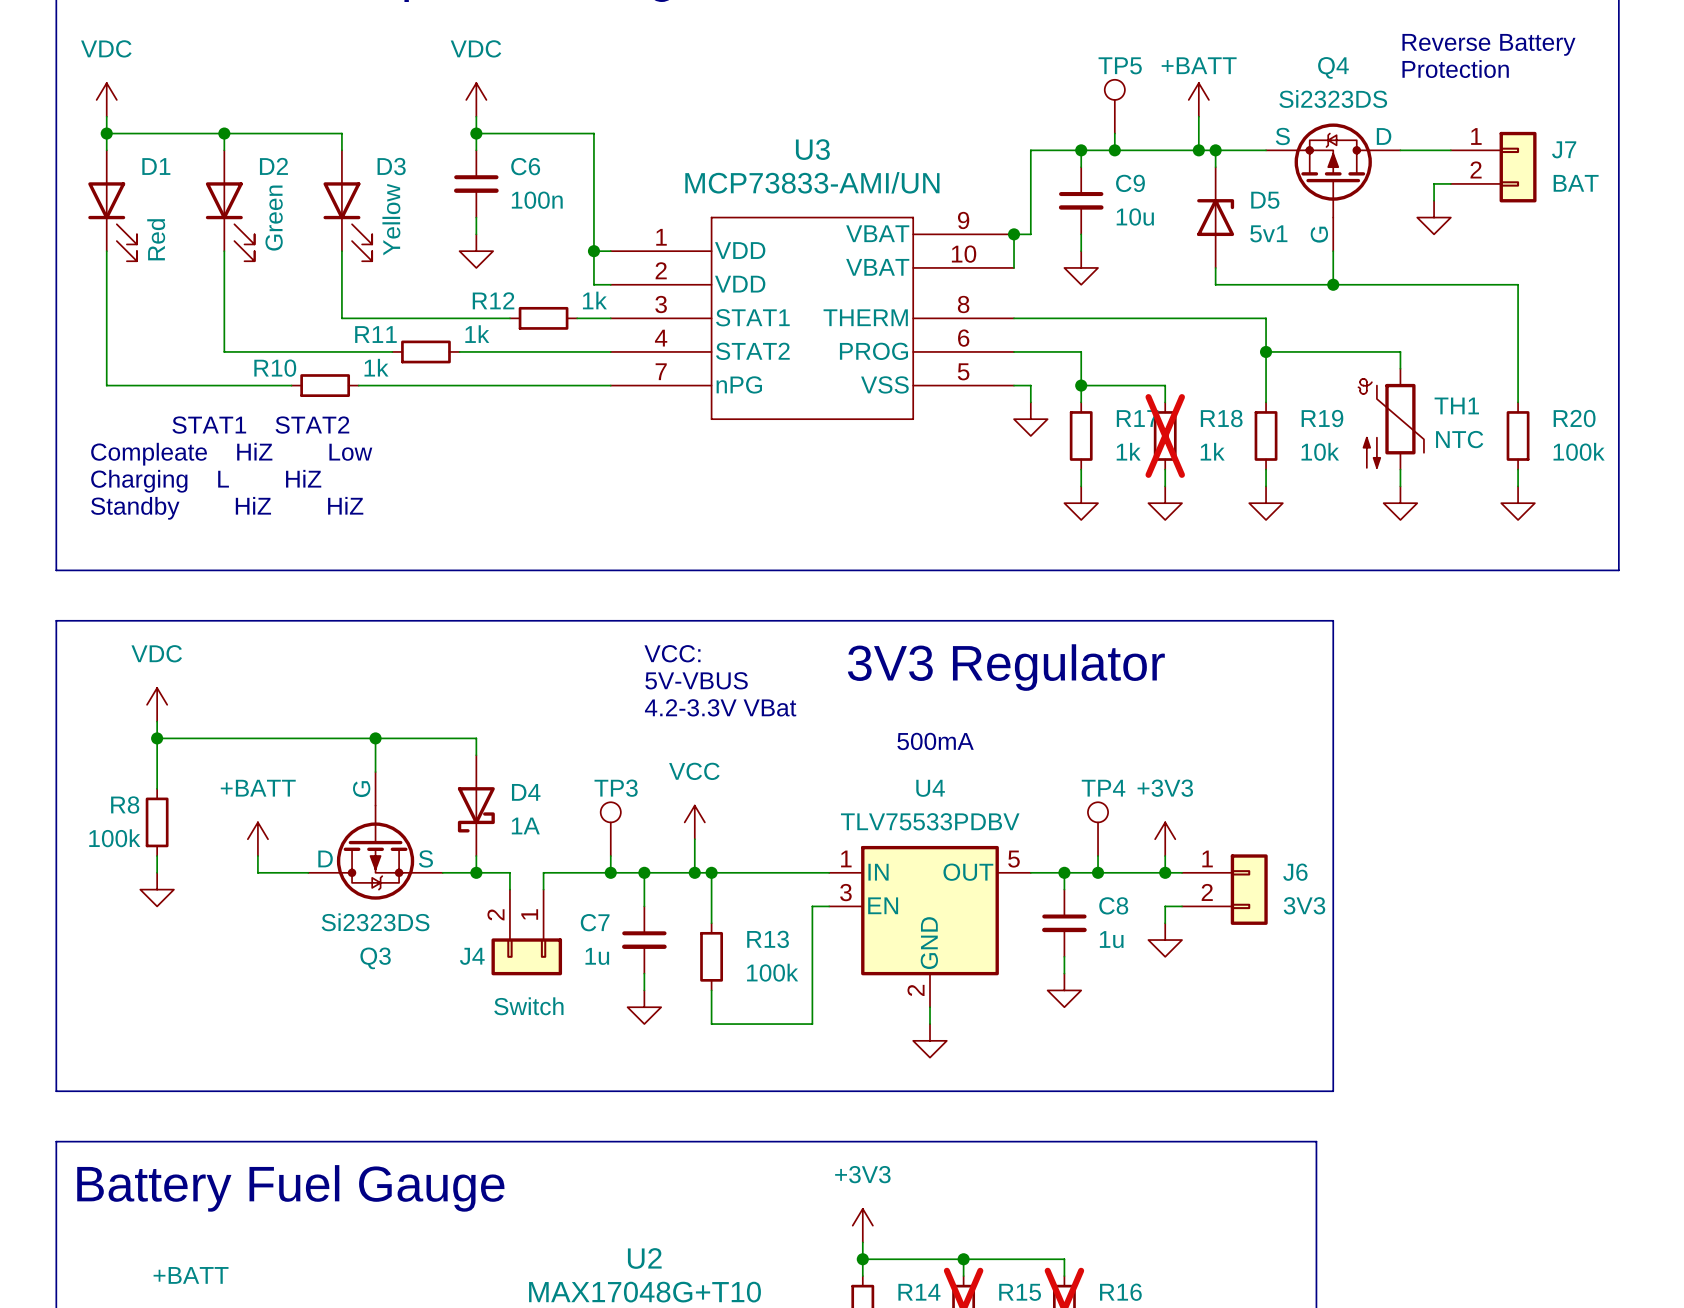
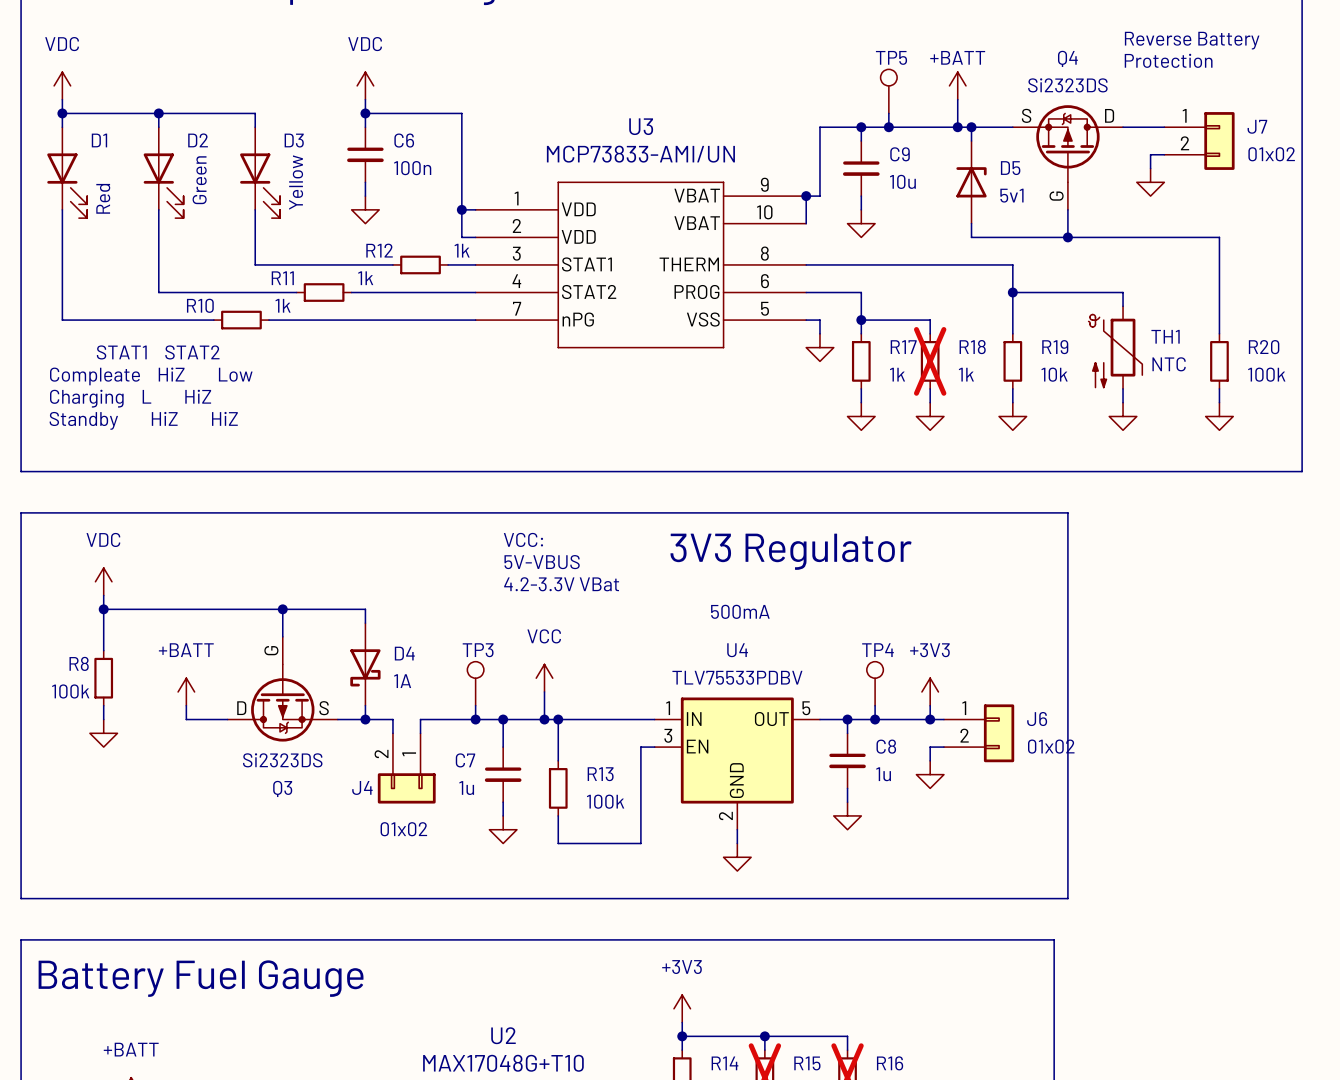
J7 value: BAT (1576, 183) -> 01x02 (1271, 154)
J6 value: 3V3 (1304, 905) -> 01x02 (1051, 746)
J4 value: Switch (528, 1006) -> 01x02 (403, 829)

